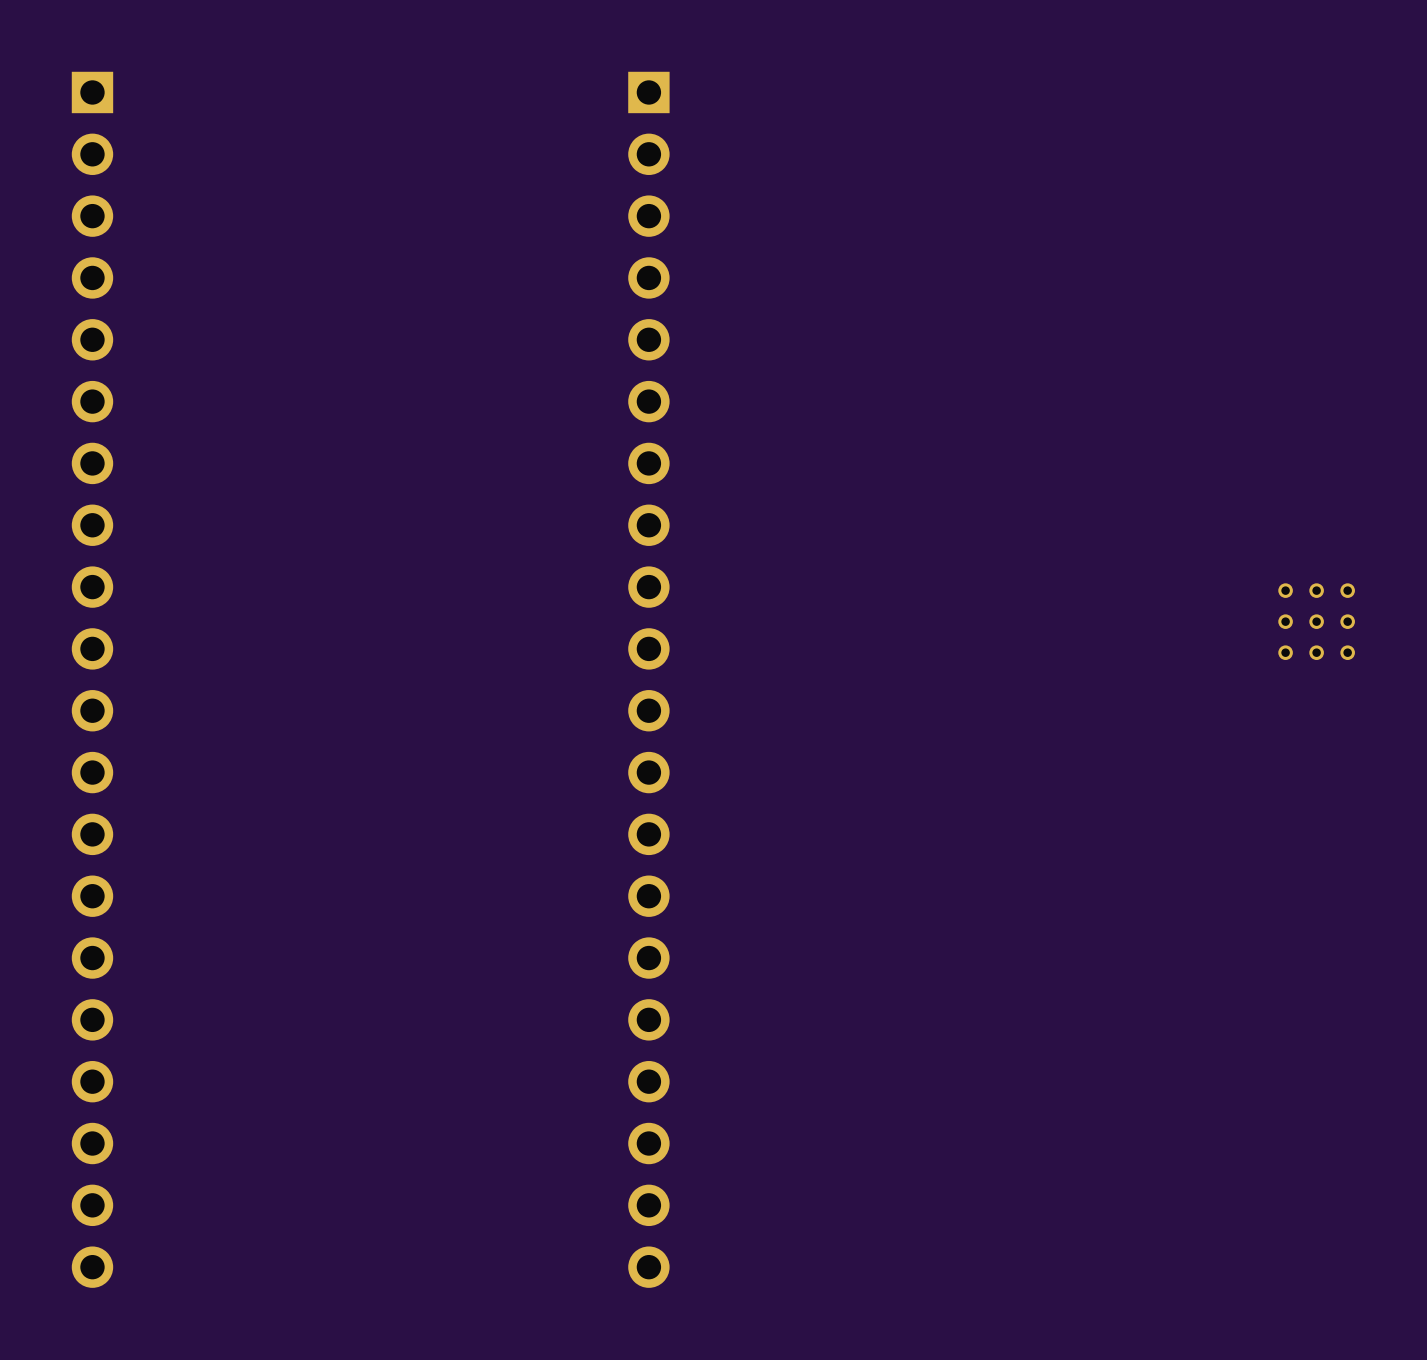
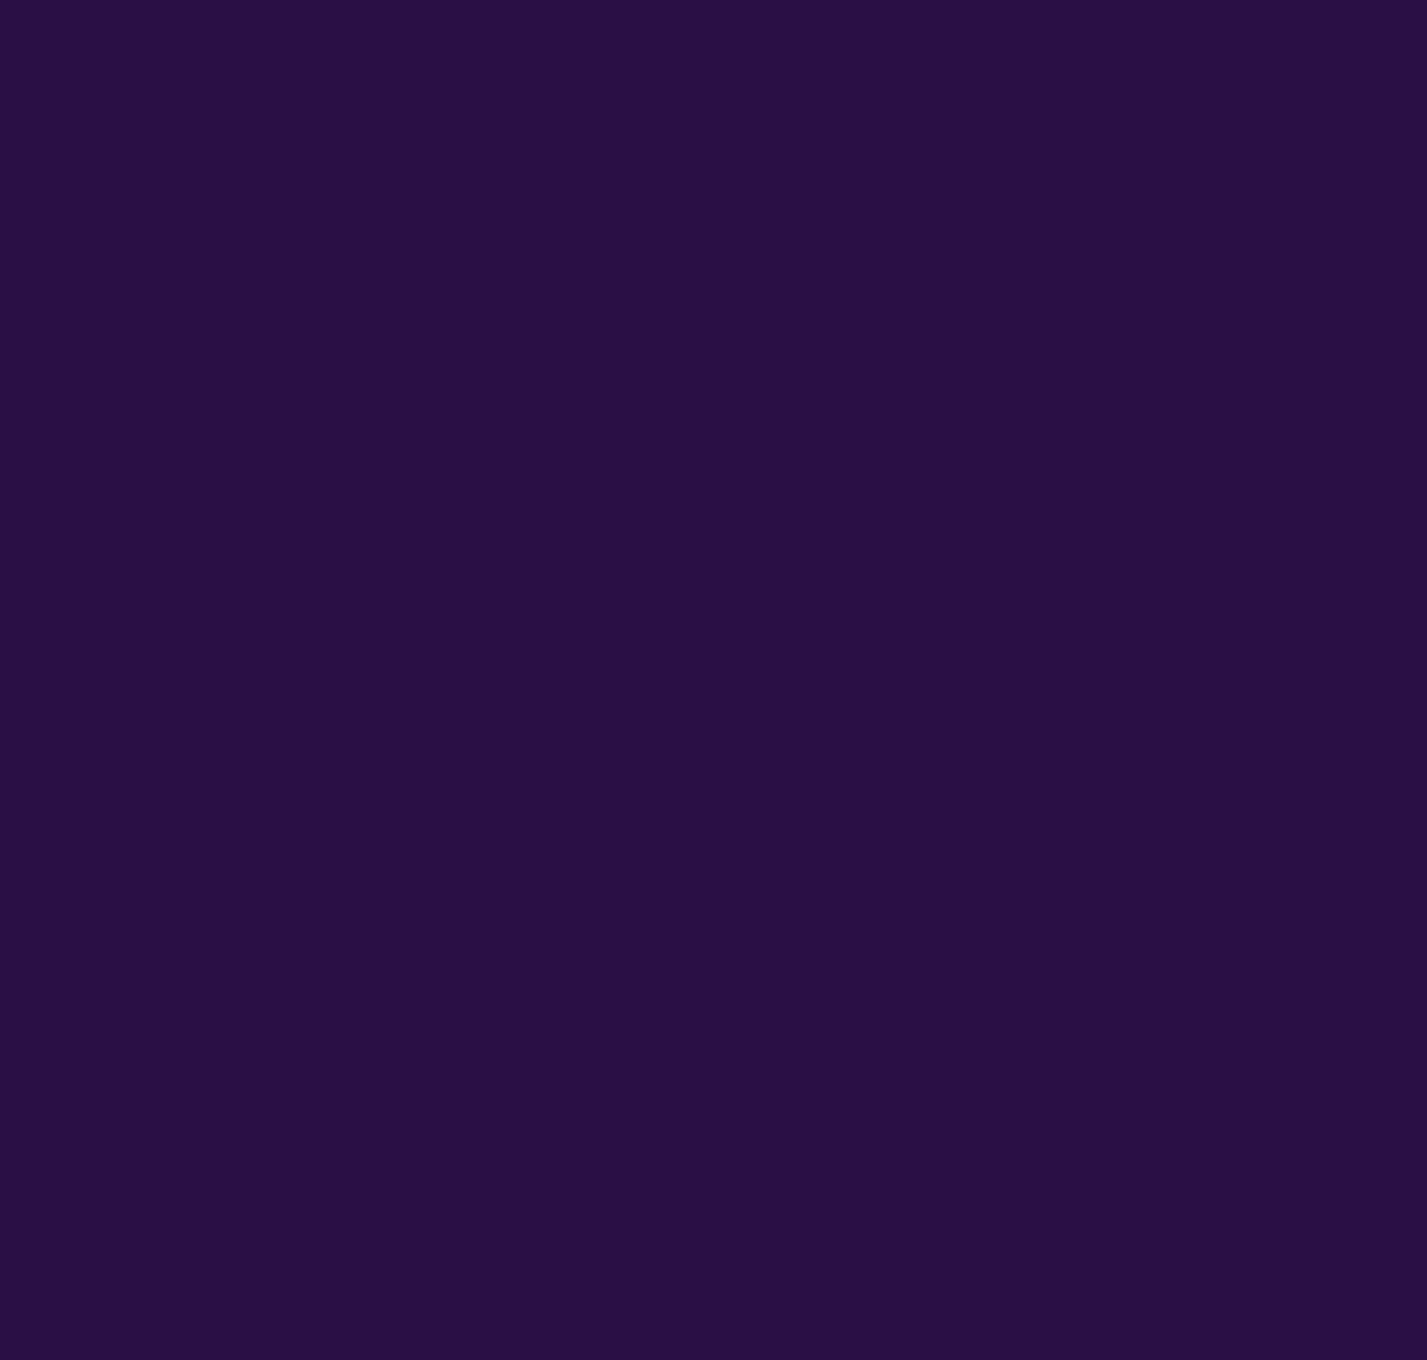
part: (1316, 621) -> none
part: (92, 679) -> none
part: (648, 679) -> none

